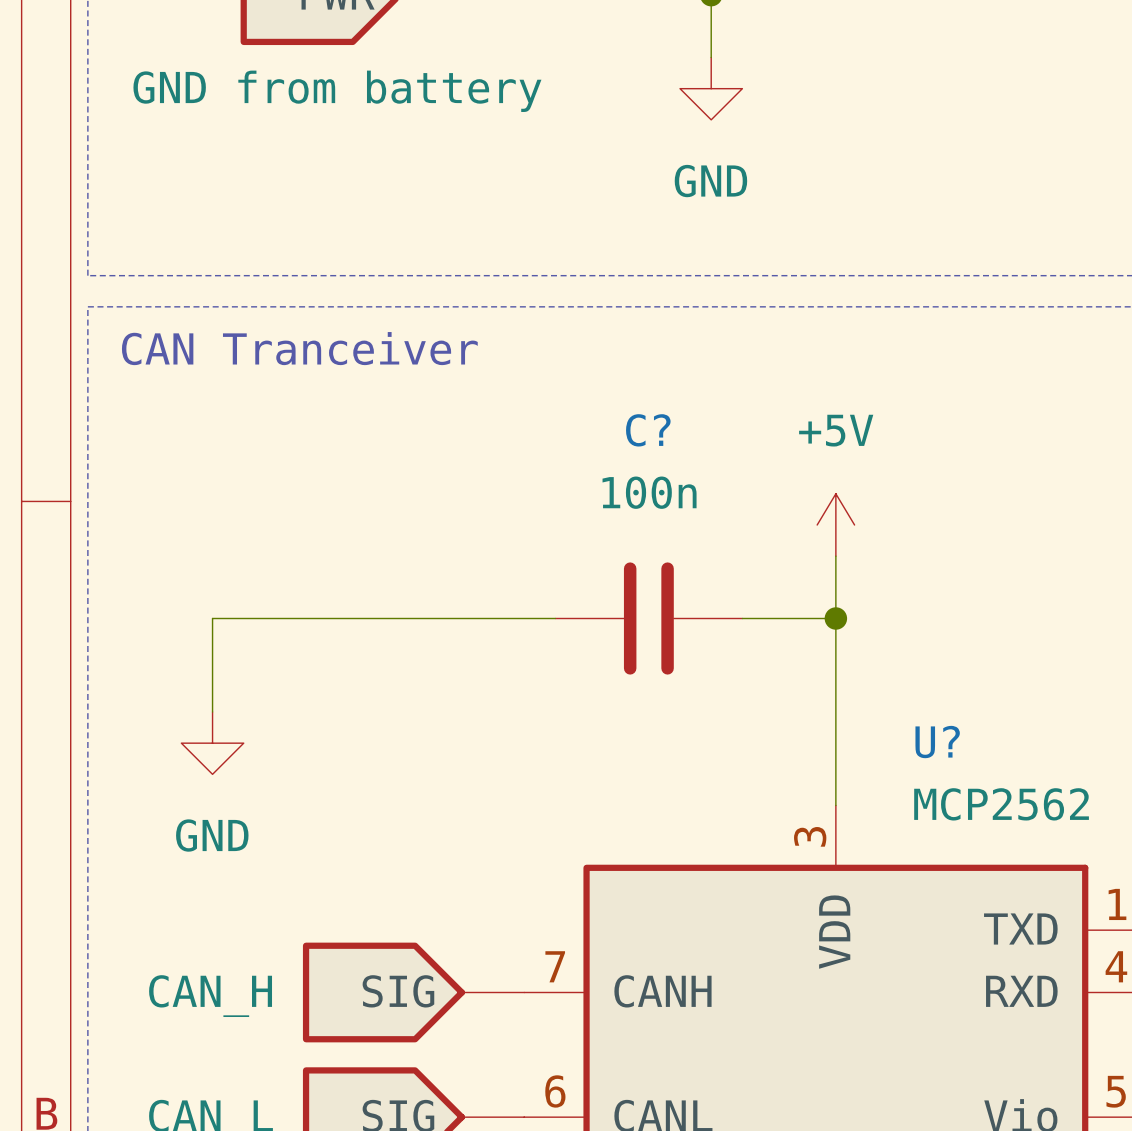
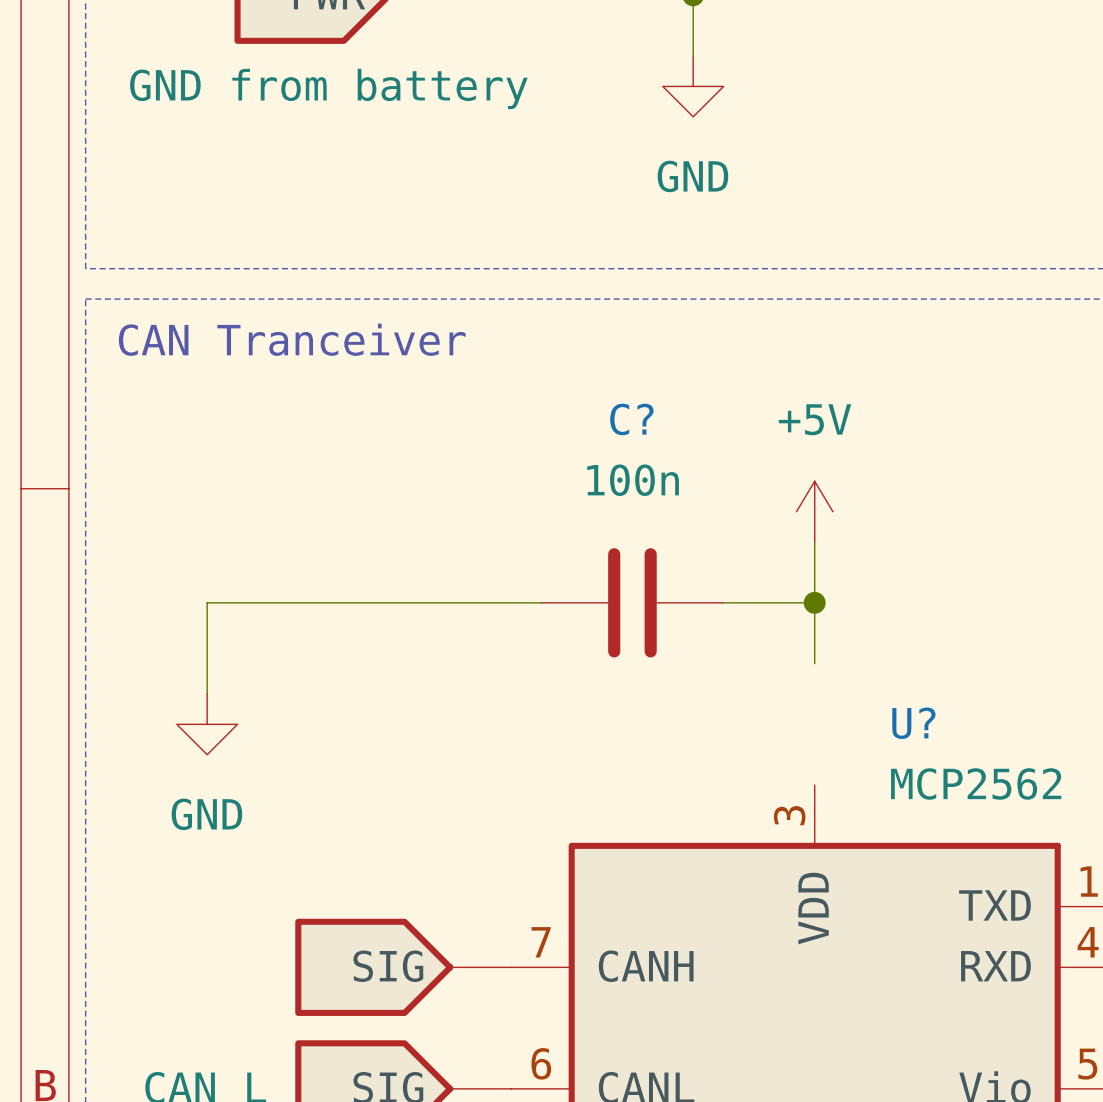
wire: (835, 680) (835, 805) -> none
power symbol text: CAN_H (210, 996) -> none

